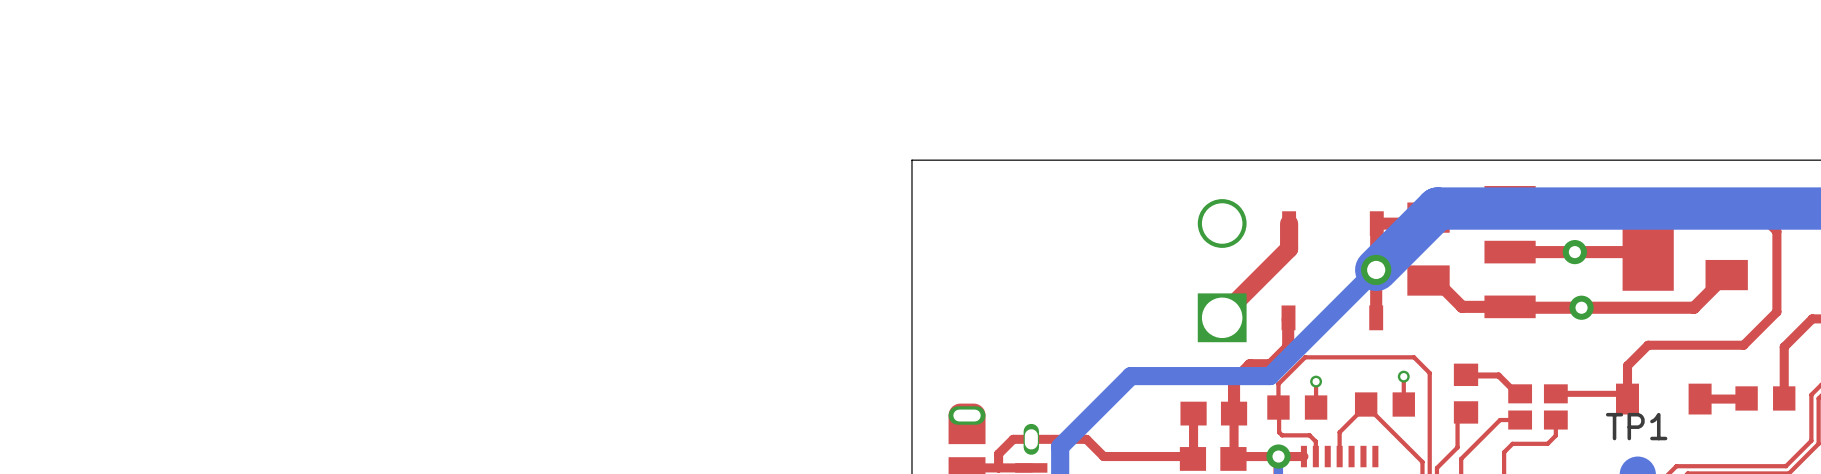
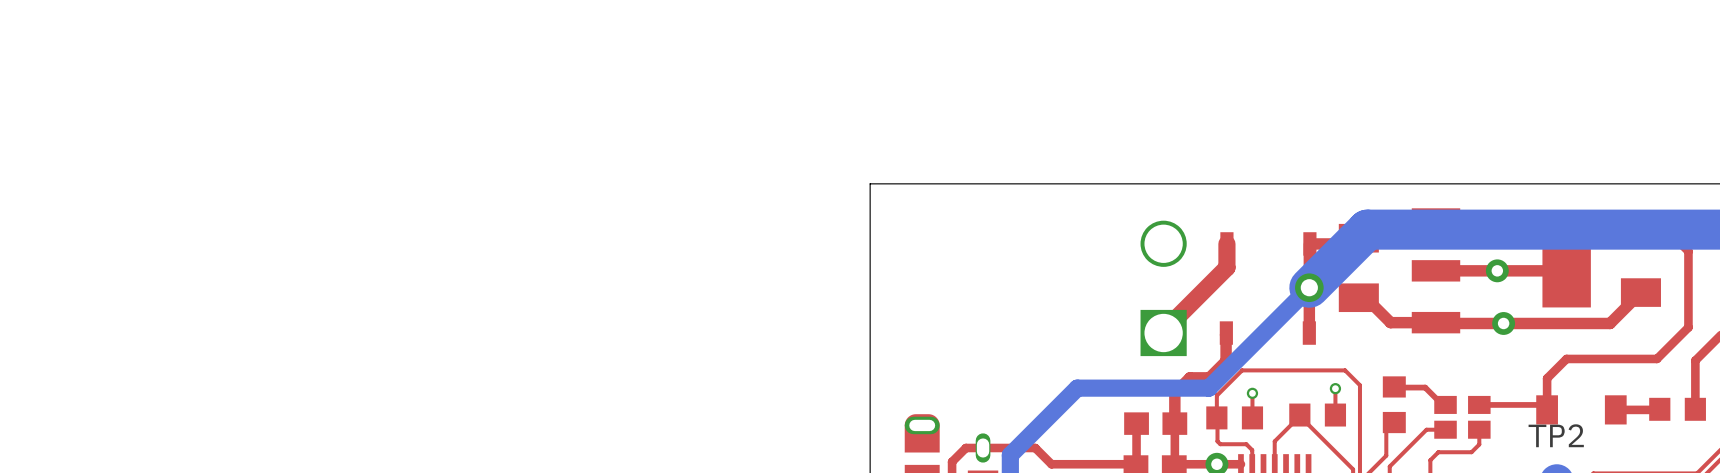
TP1 name: TP1 (1636, 426) -> TP2 (1556, 435)

